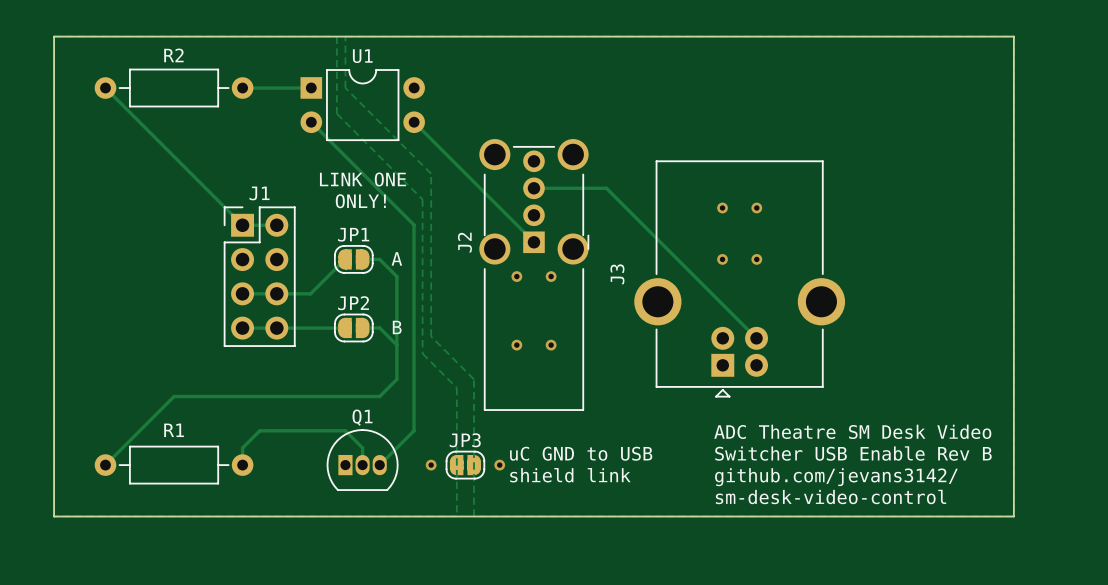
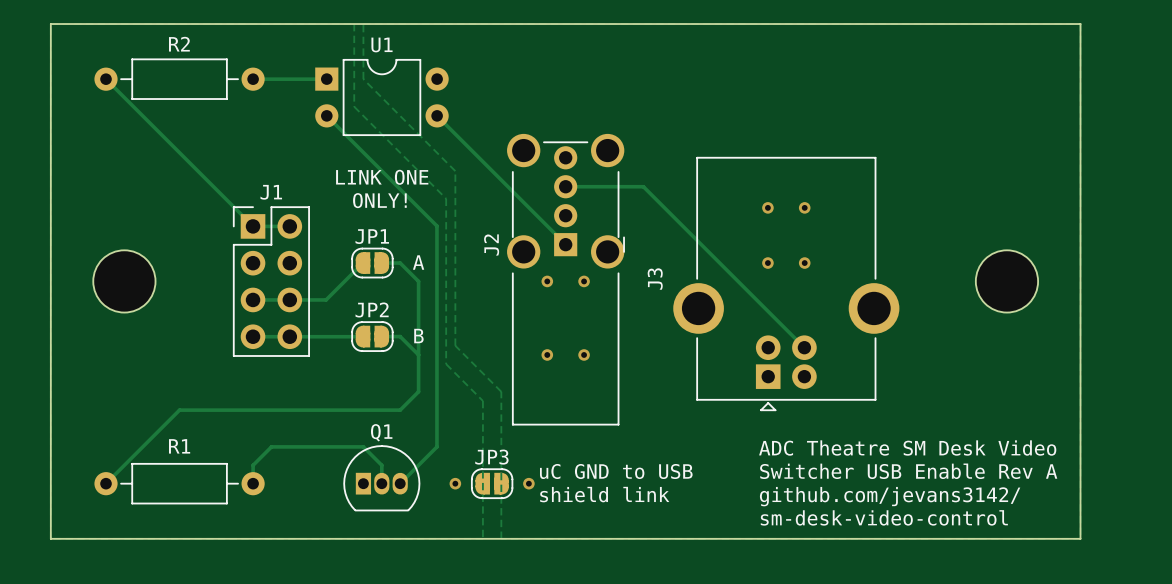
part: none -> (124, 281)
part: none -> (1006, 281)
text: Switcher USB Enable Rev B (853, 453) -> Switcher USB Enable Rev A (908, 471)

